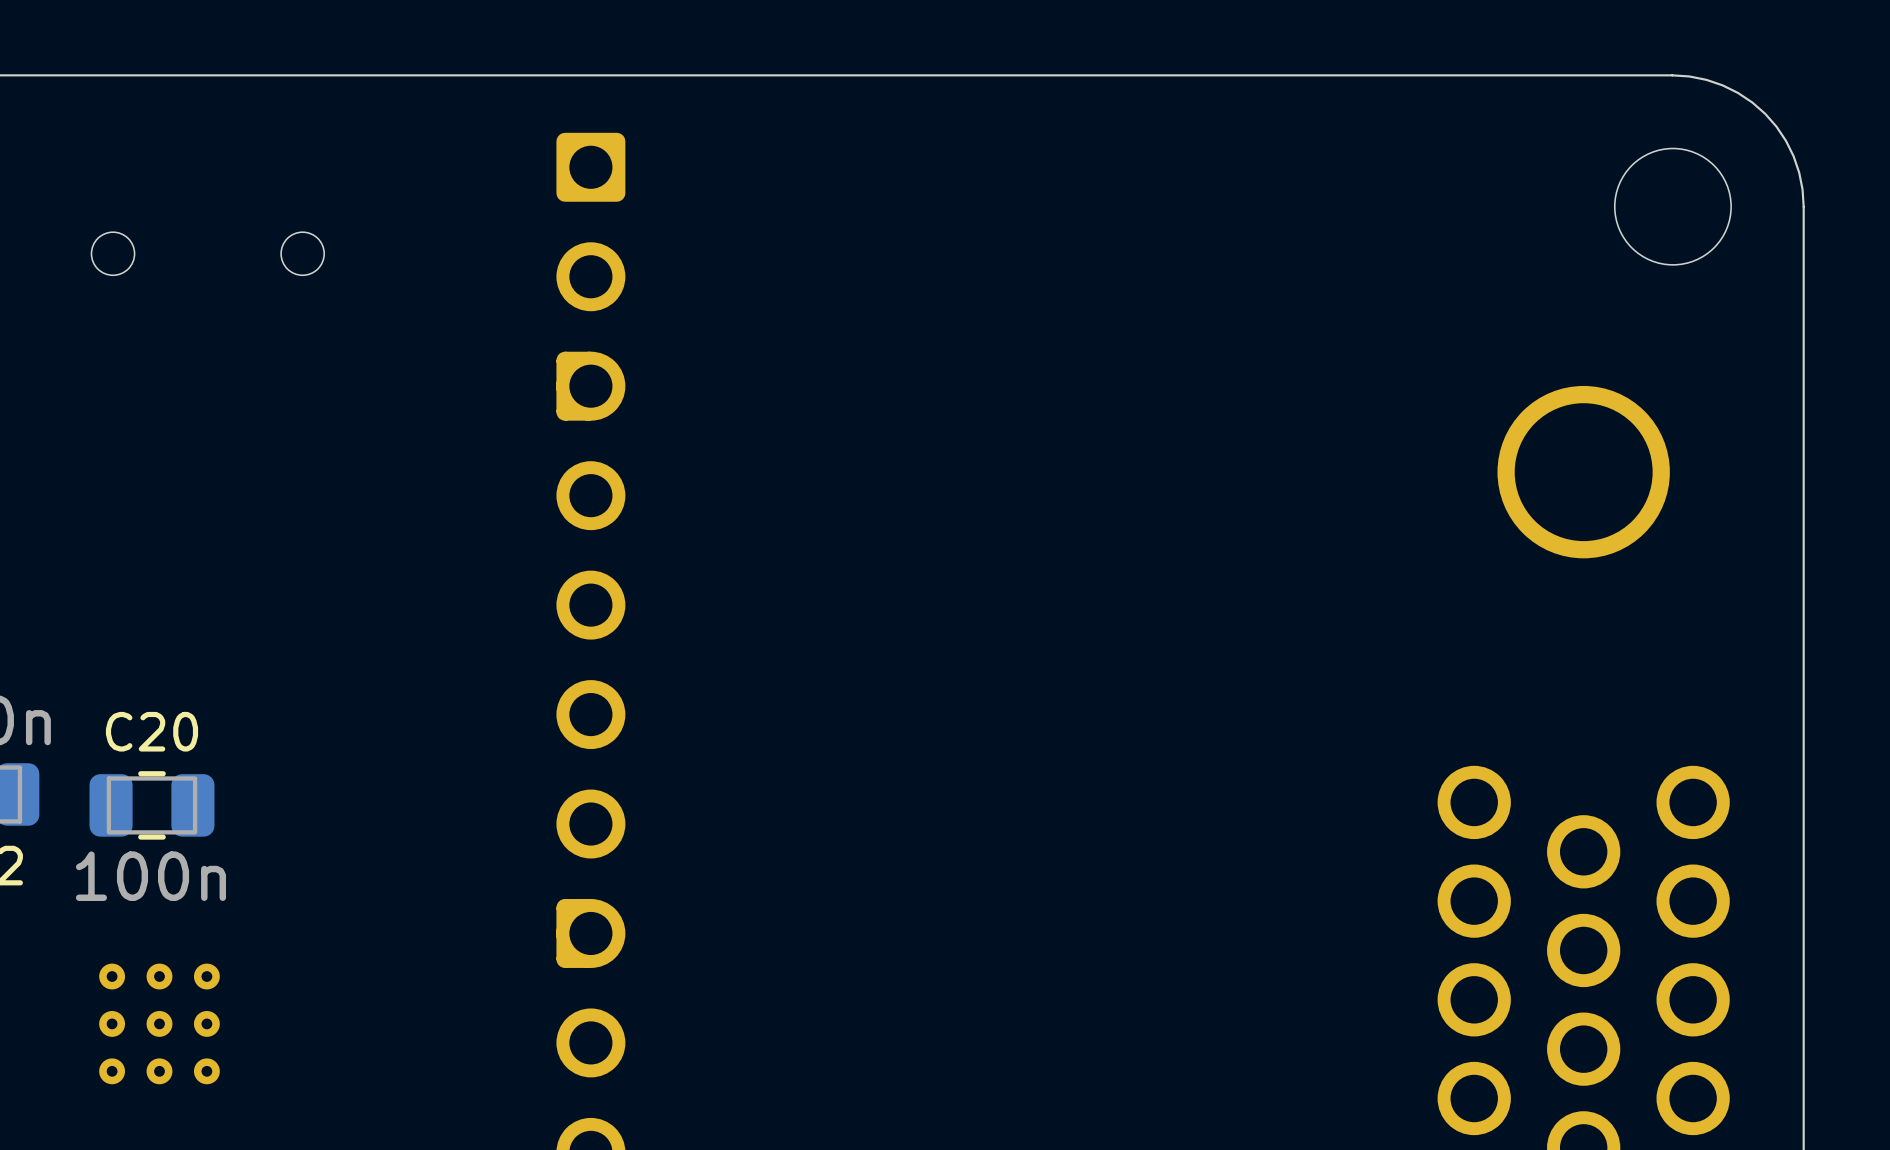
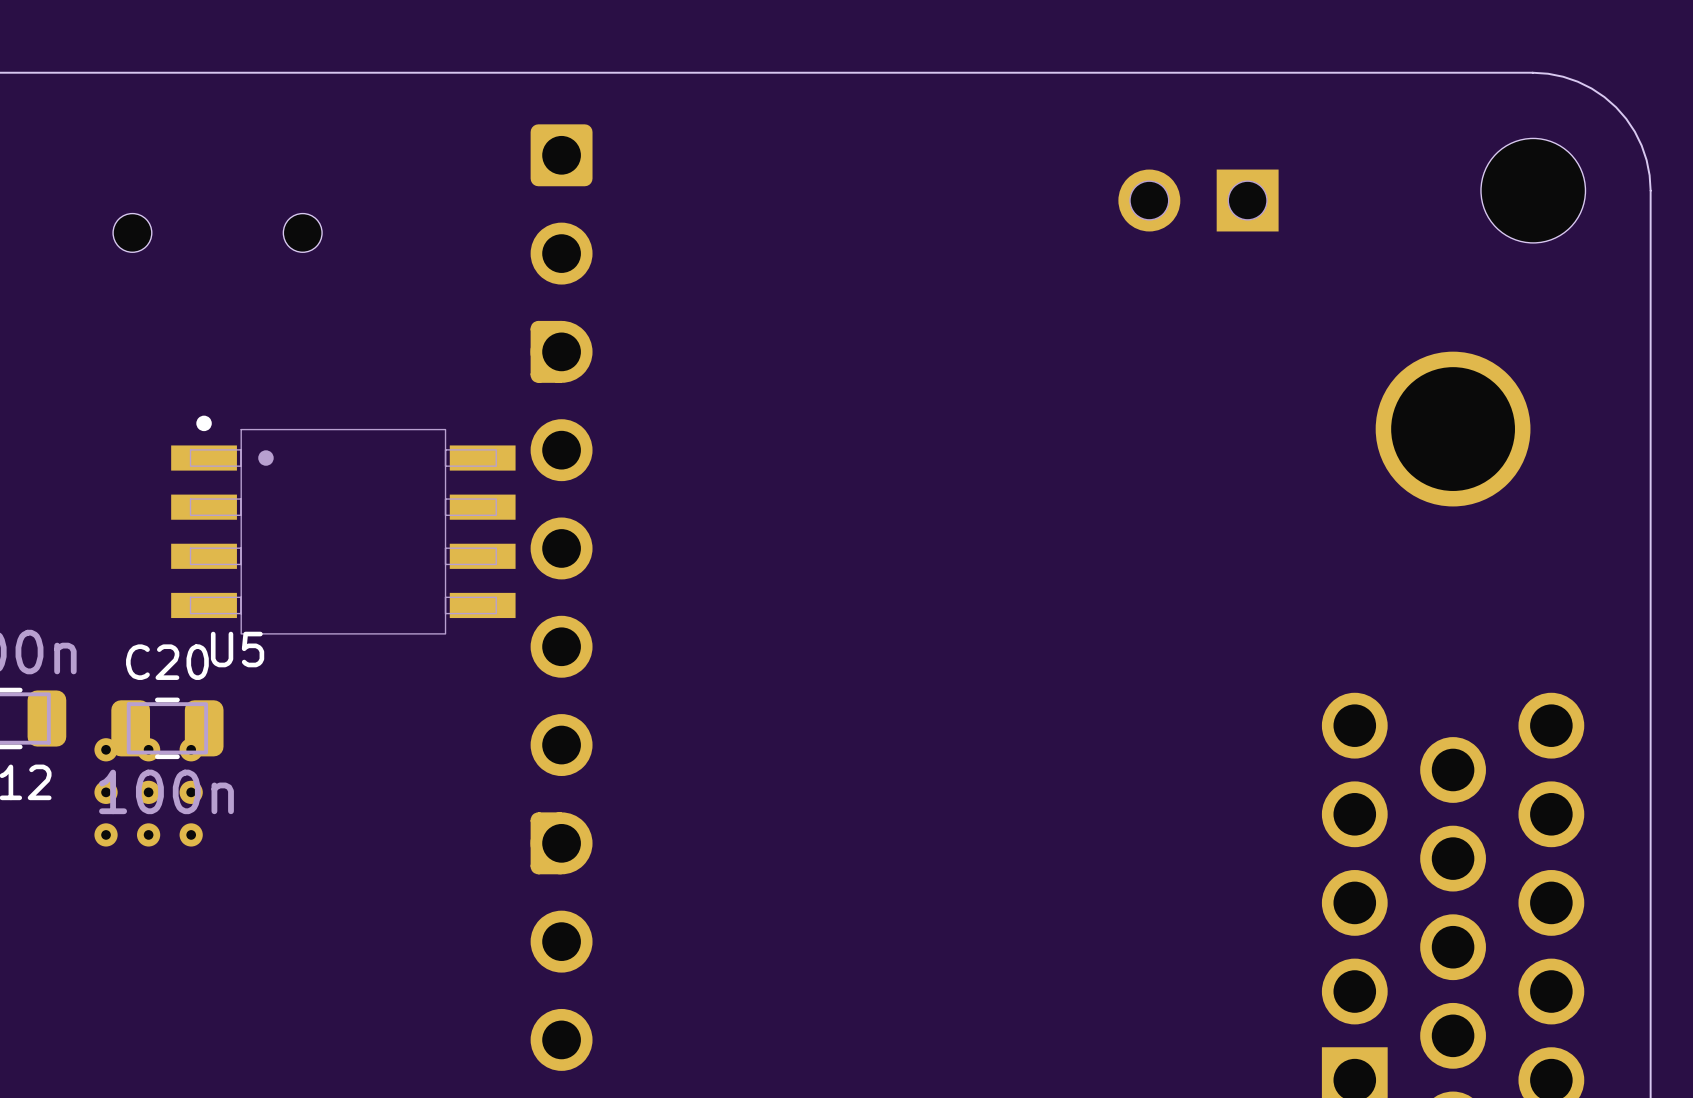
part: none -> (1198, 200)
U5: none -> (343, 524)
part position: (159, 1023) -> (148, 792)

